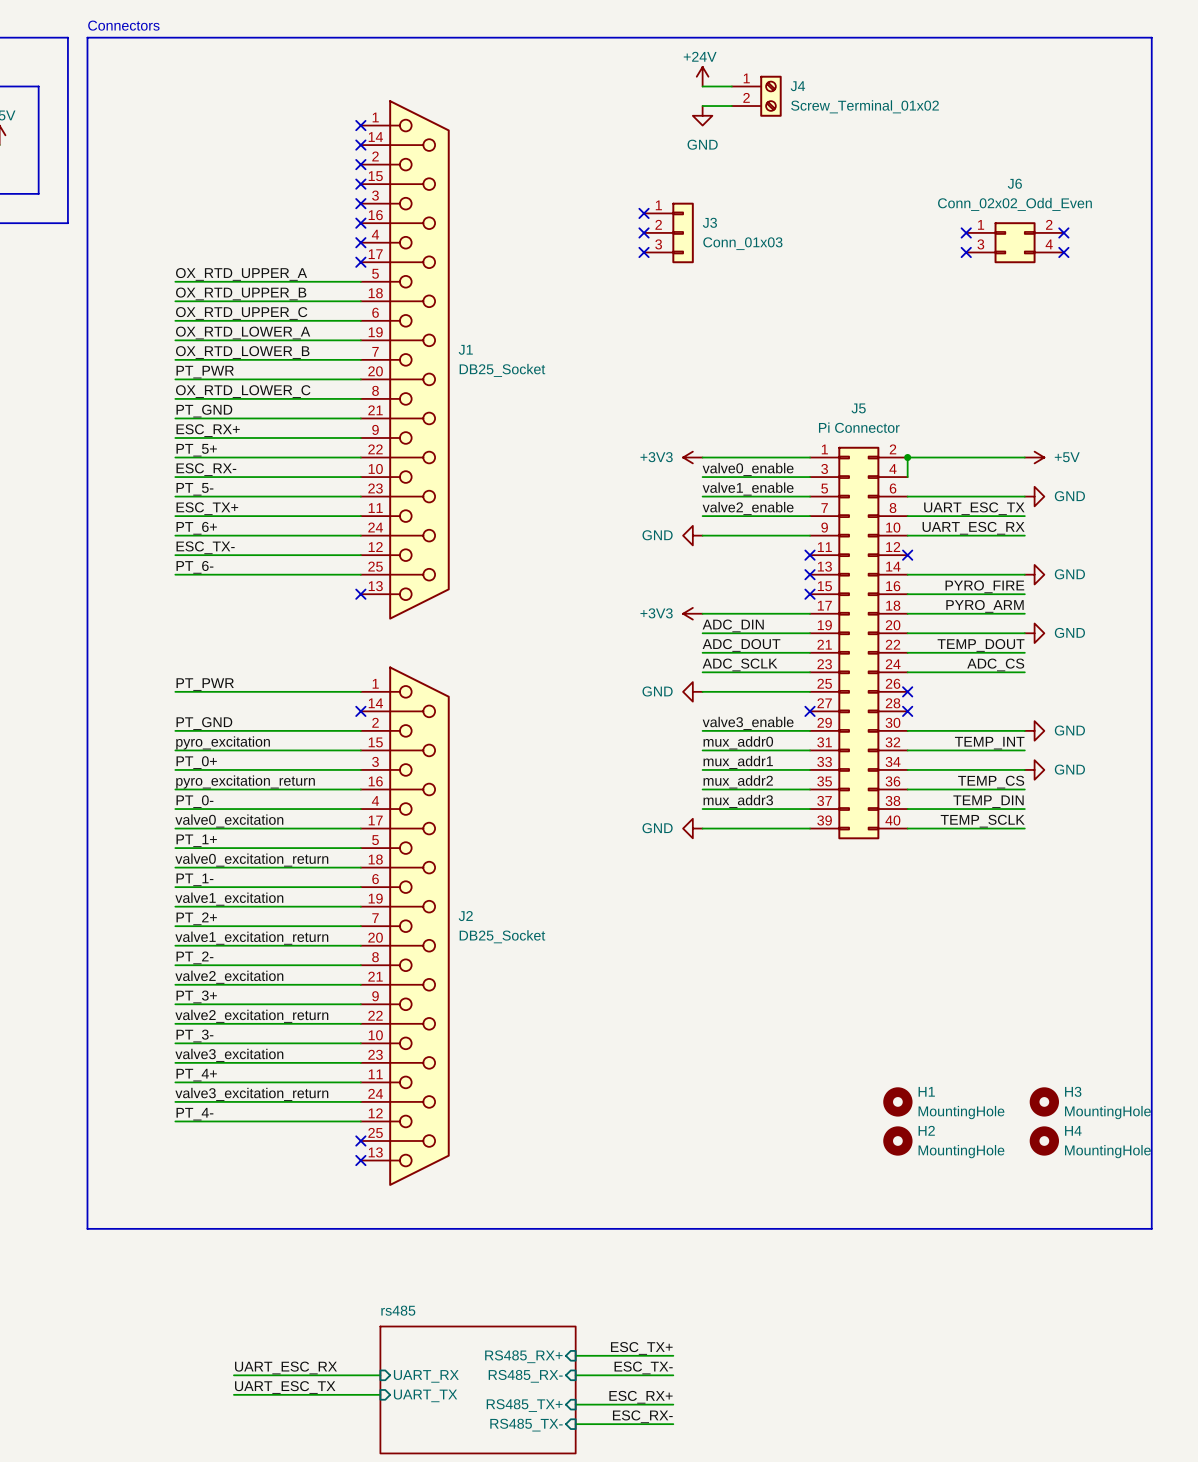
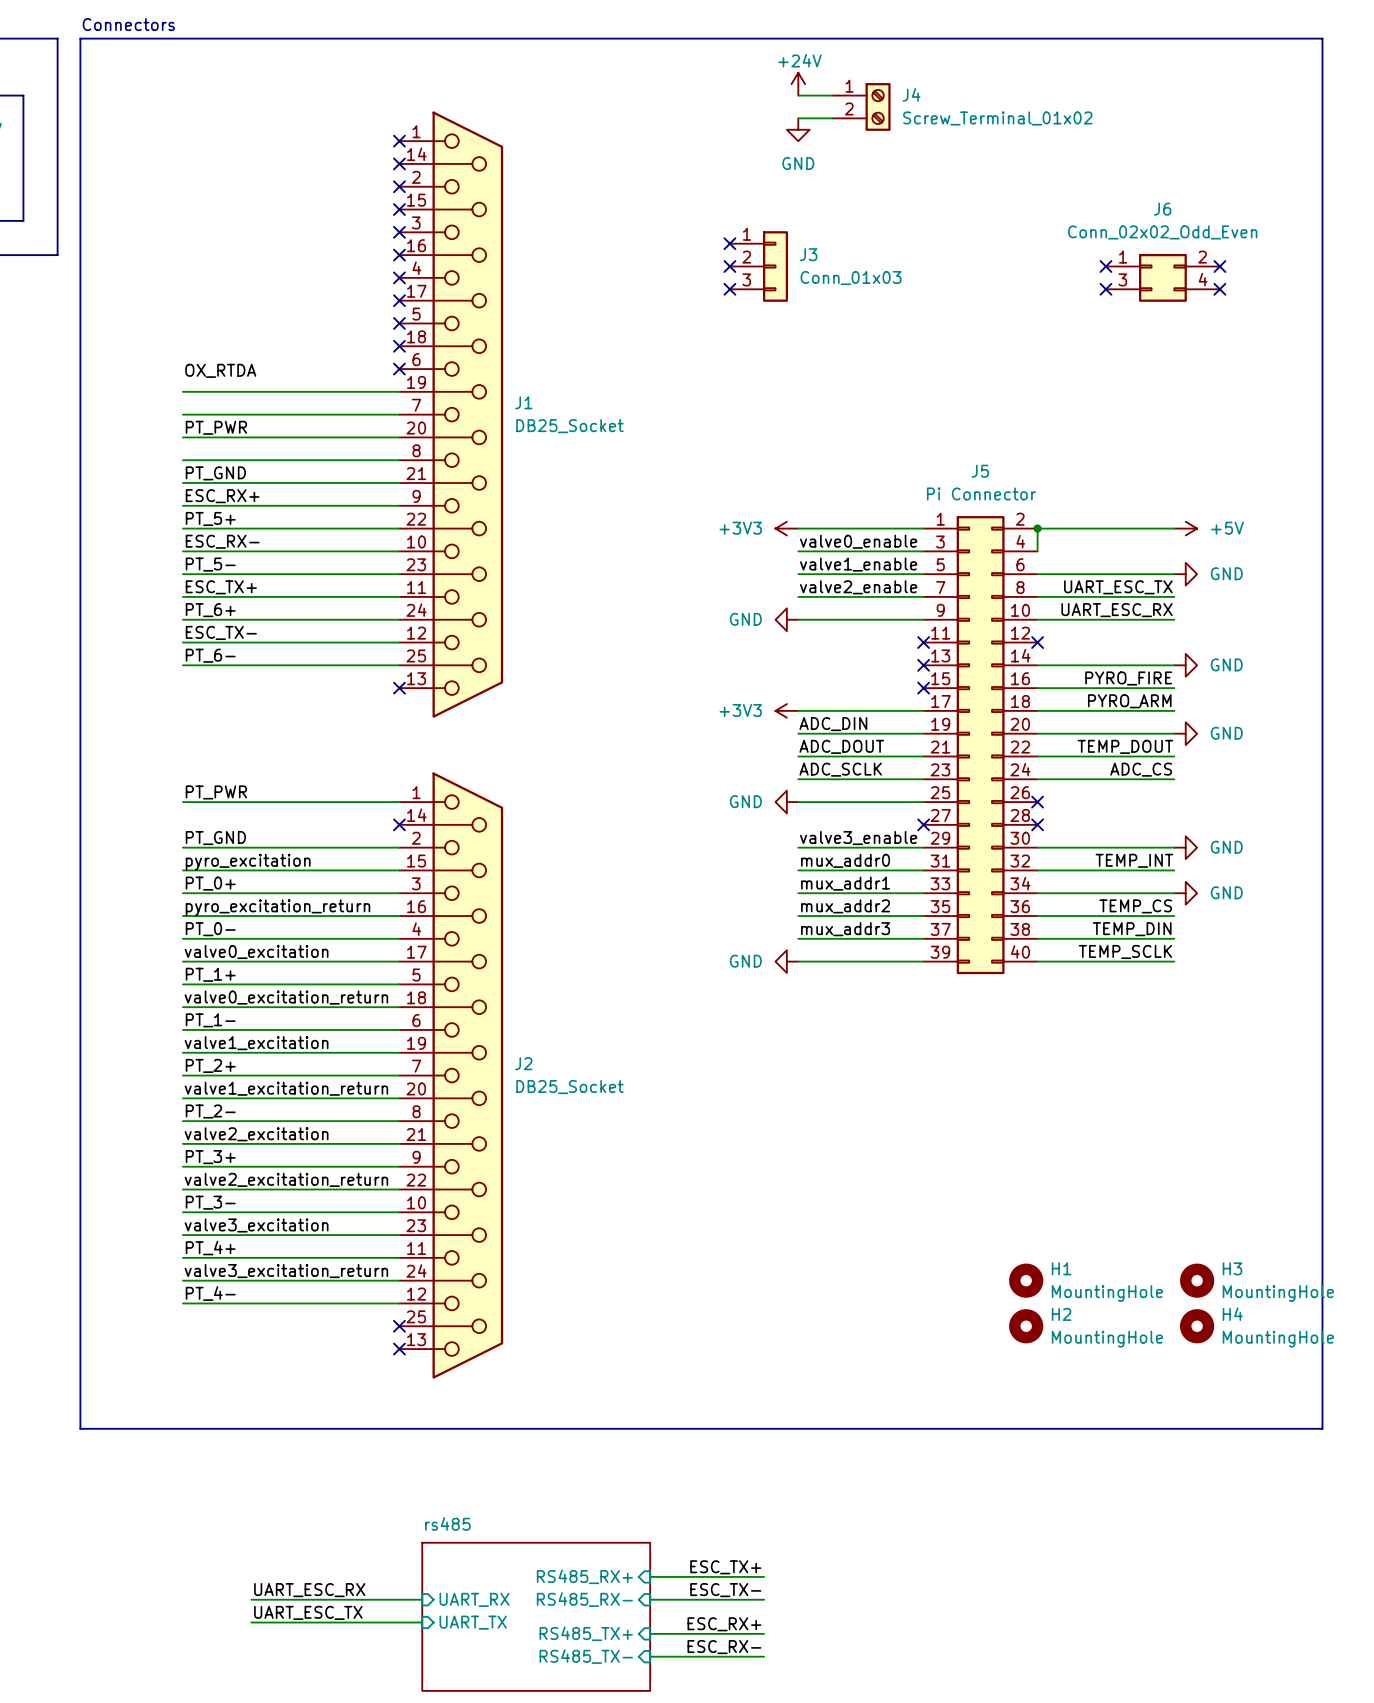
label: OX_RTD_UPPER_A (241, 274) -> none
wire: (175, 281) (360, 281) -> none
no-connect mark: none -> (399, 323)
label: OX_RTD_UPPER_B (241, 293) -> none
wire: (175, 301) (360, 301) -> none
no-connect mark: none -> (399, 346)
label: OX_RTD_UPPER_C (241, 313) -> none
wire: (175, 320) (360, 320) -> none
no-connect mark: none -> (399, 369)
label: OX_RTD_LOWER_A (243, 332) -> OX_RTDA (220, 370)
label: OX_RTD_LOWER_B (242, 352) -> none
label: OX_RTD_LOWER_C (243, 391) -> none

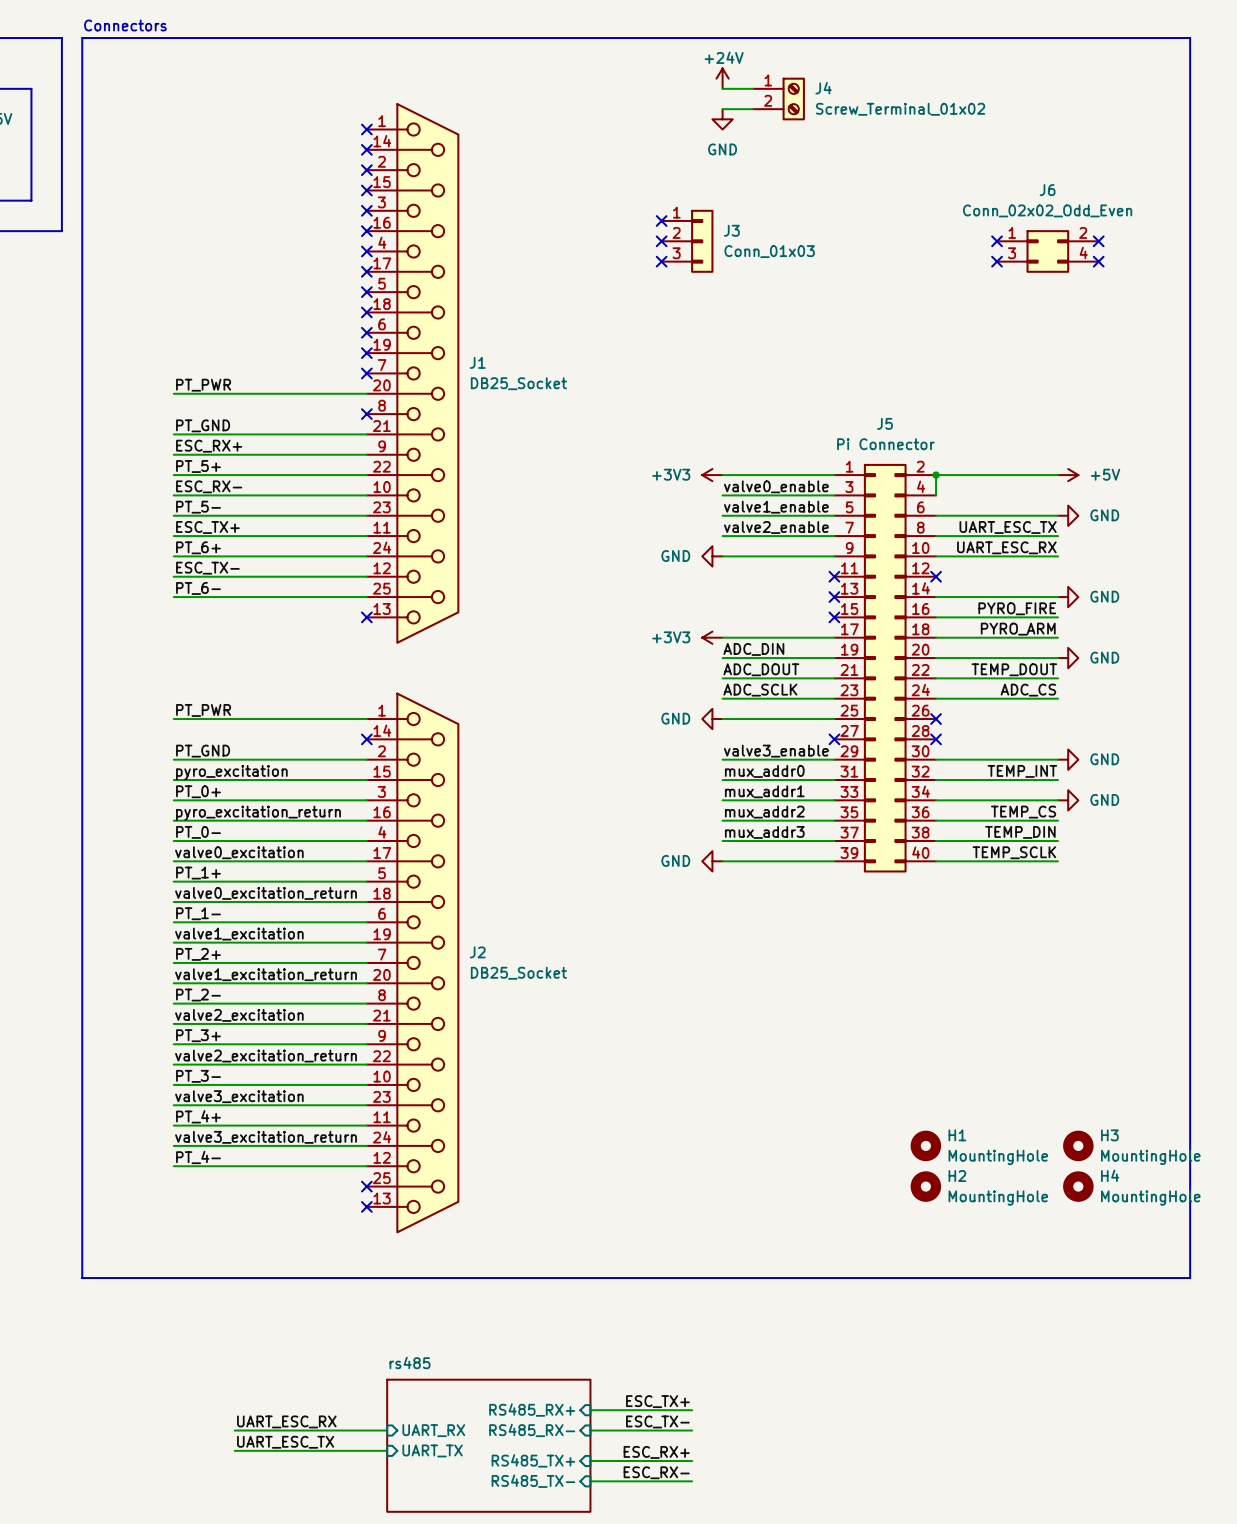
label: OX_RTDA (220, 370) -> none
wire: (182, 391) (399, 391) -> none
no-connect mark: none -> (366, 353)
wire: (182, 414) (399, 414) -> none
no-connect mark: none -> (366, 373)
wire: (182, 460) (399, 460) -> none
no-connect mark: none -> (366, 414)

